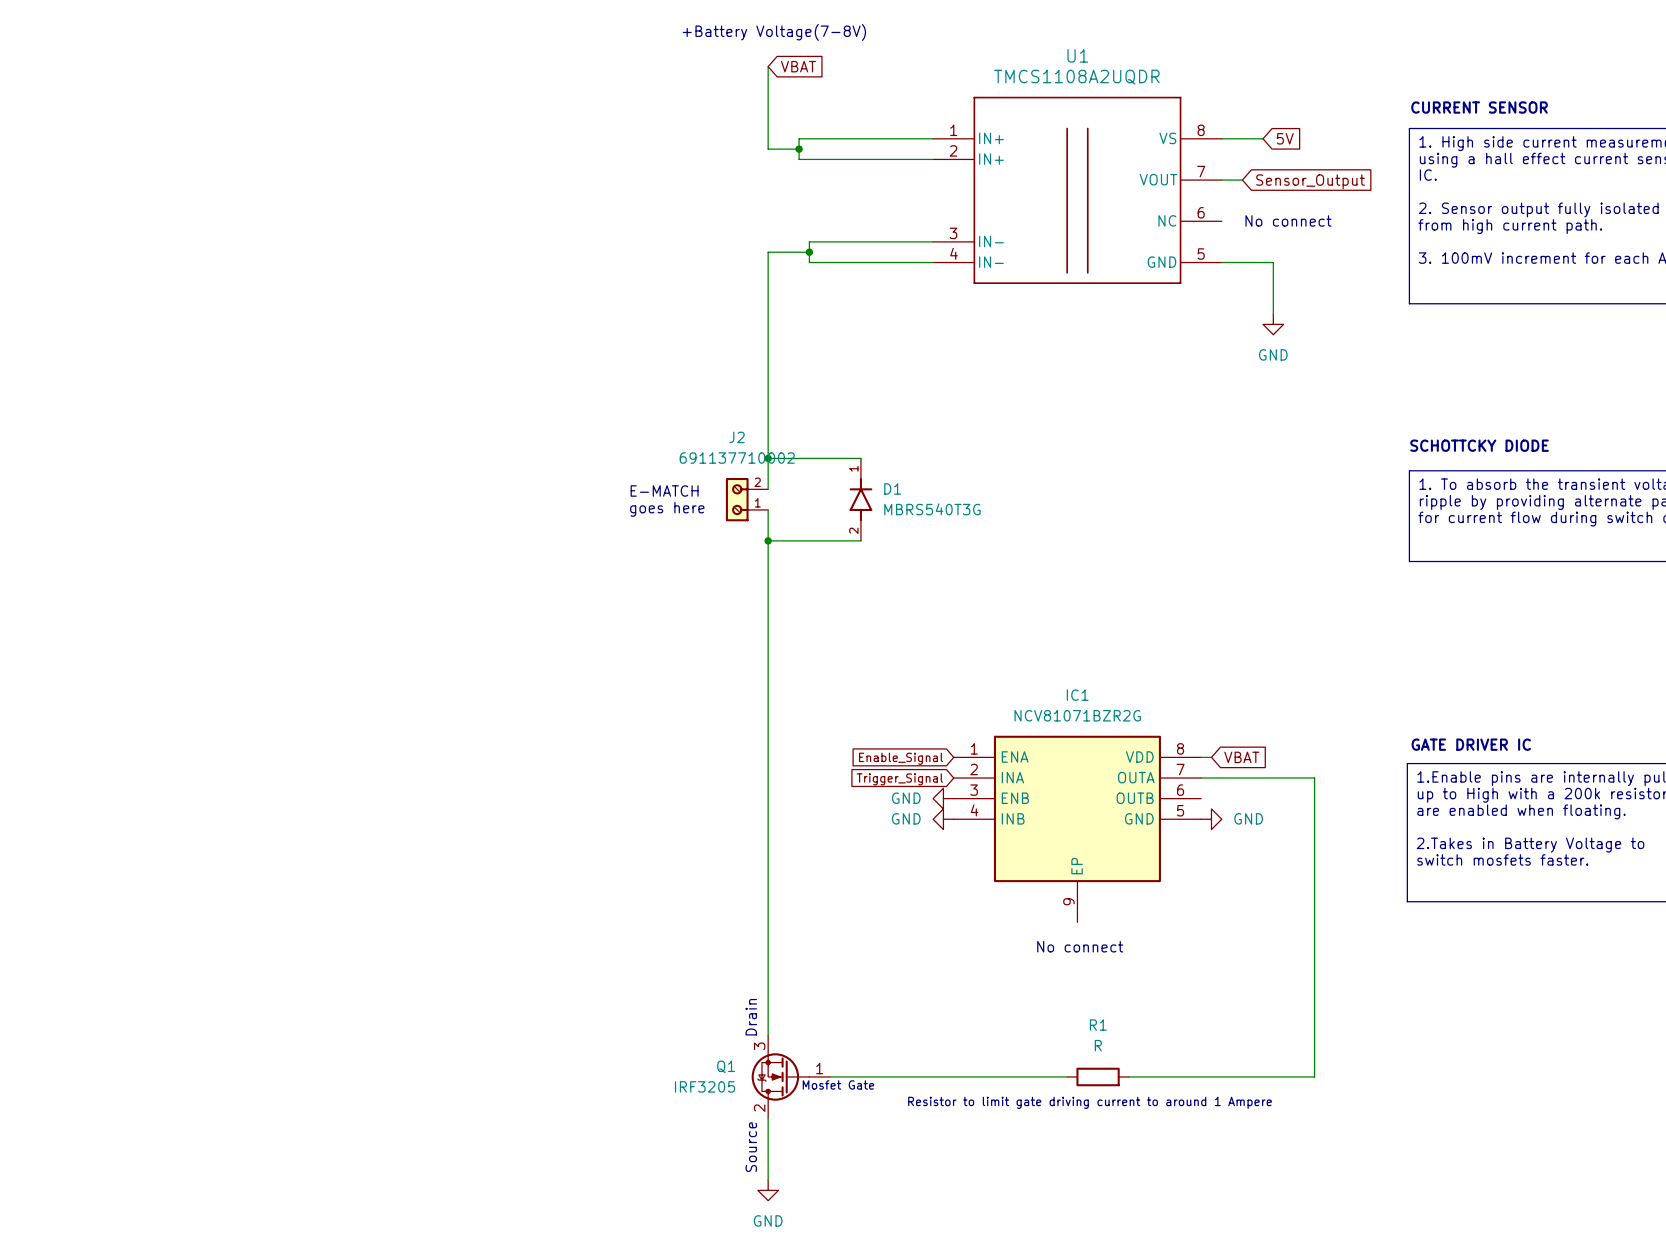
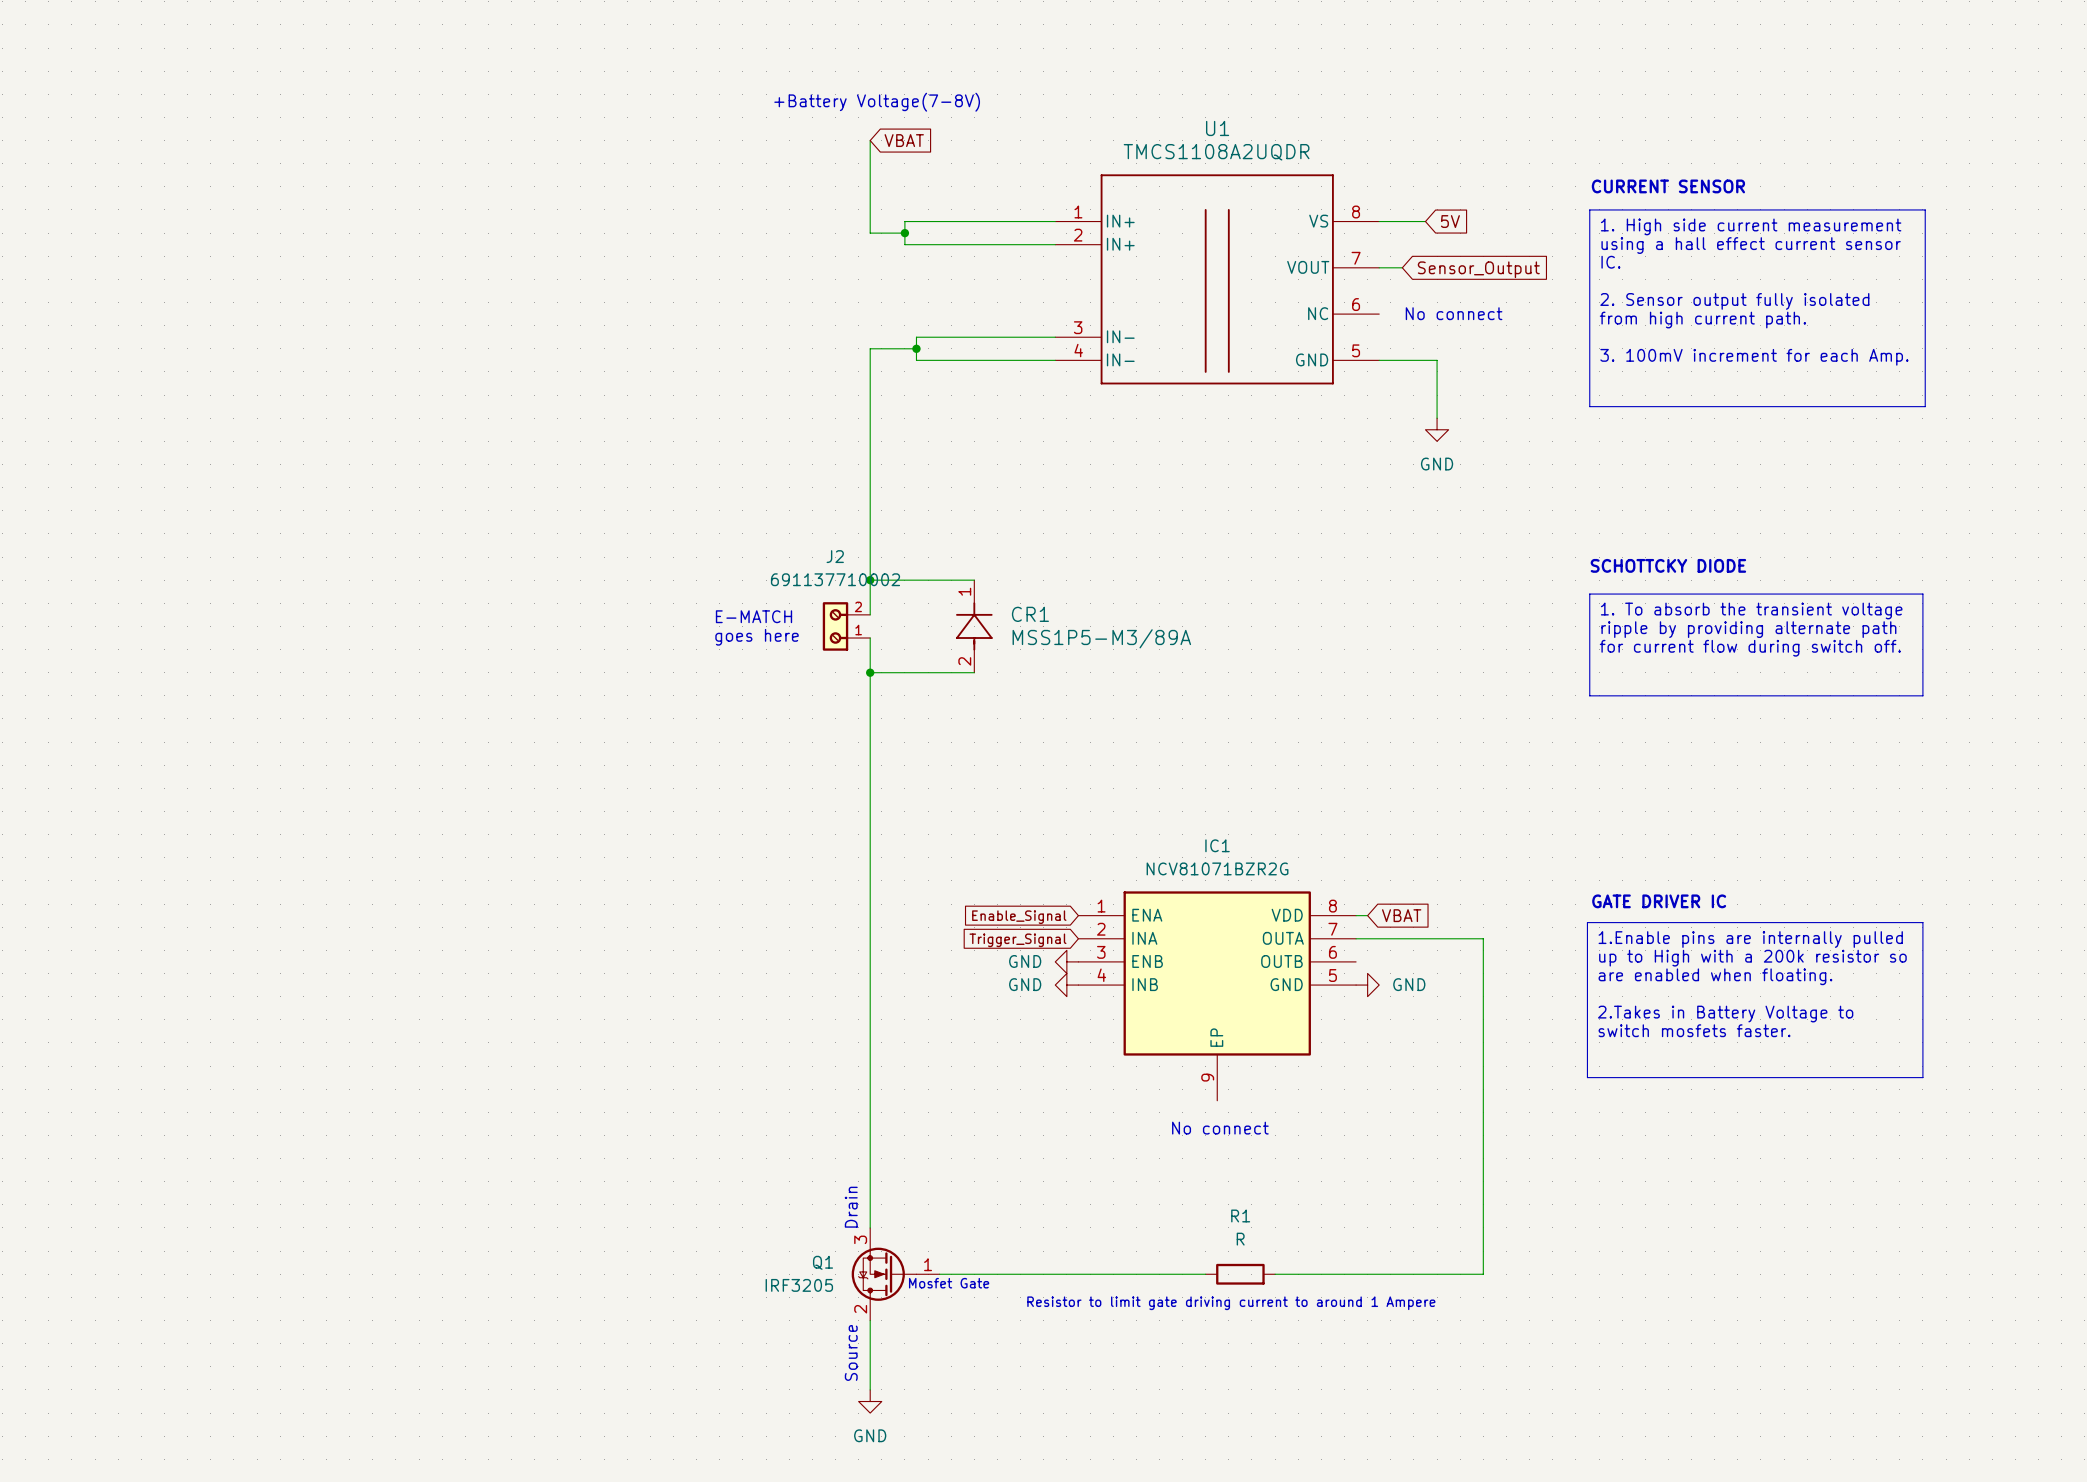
D1: MBRS540T3G (860, 499) -> none
CR1: none -> MSS1P5-M3/89A (974, 626)

